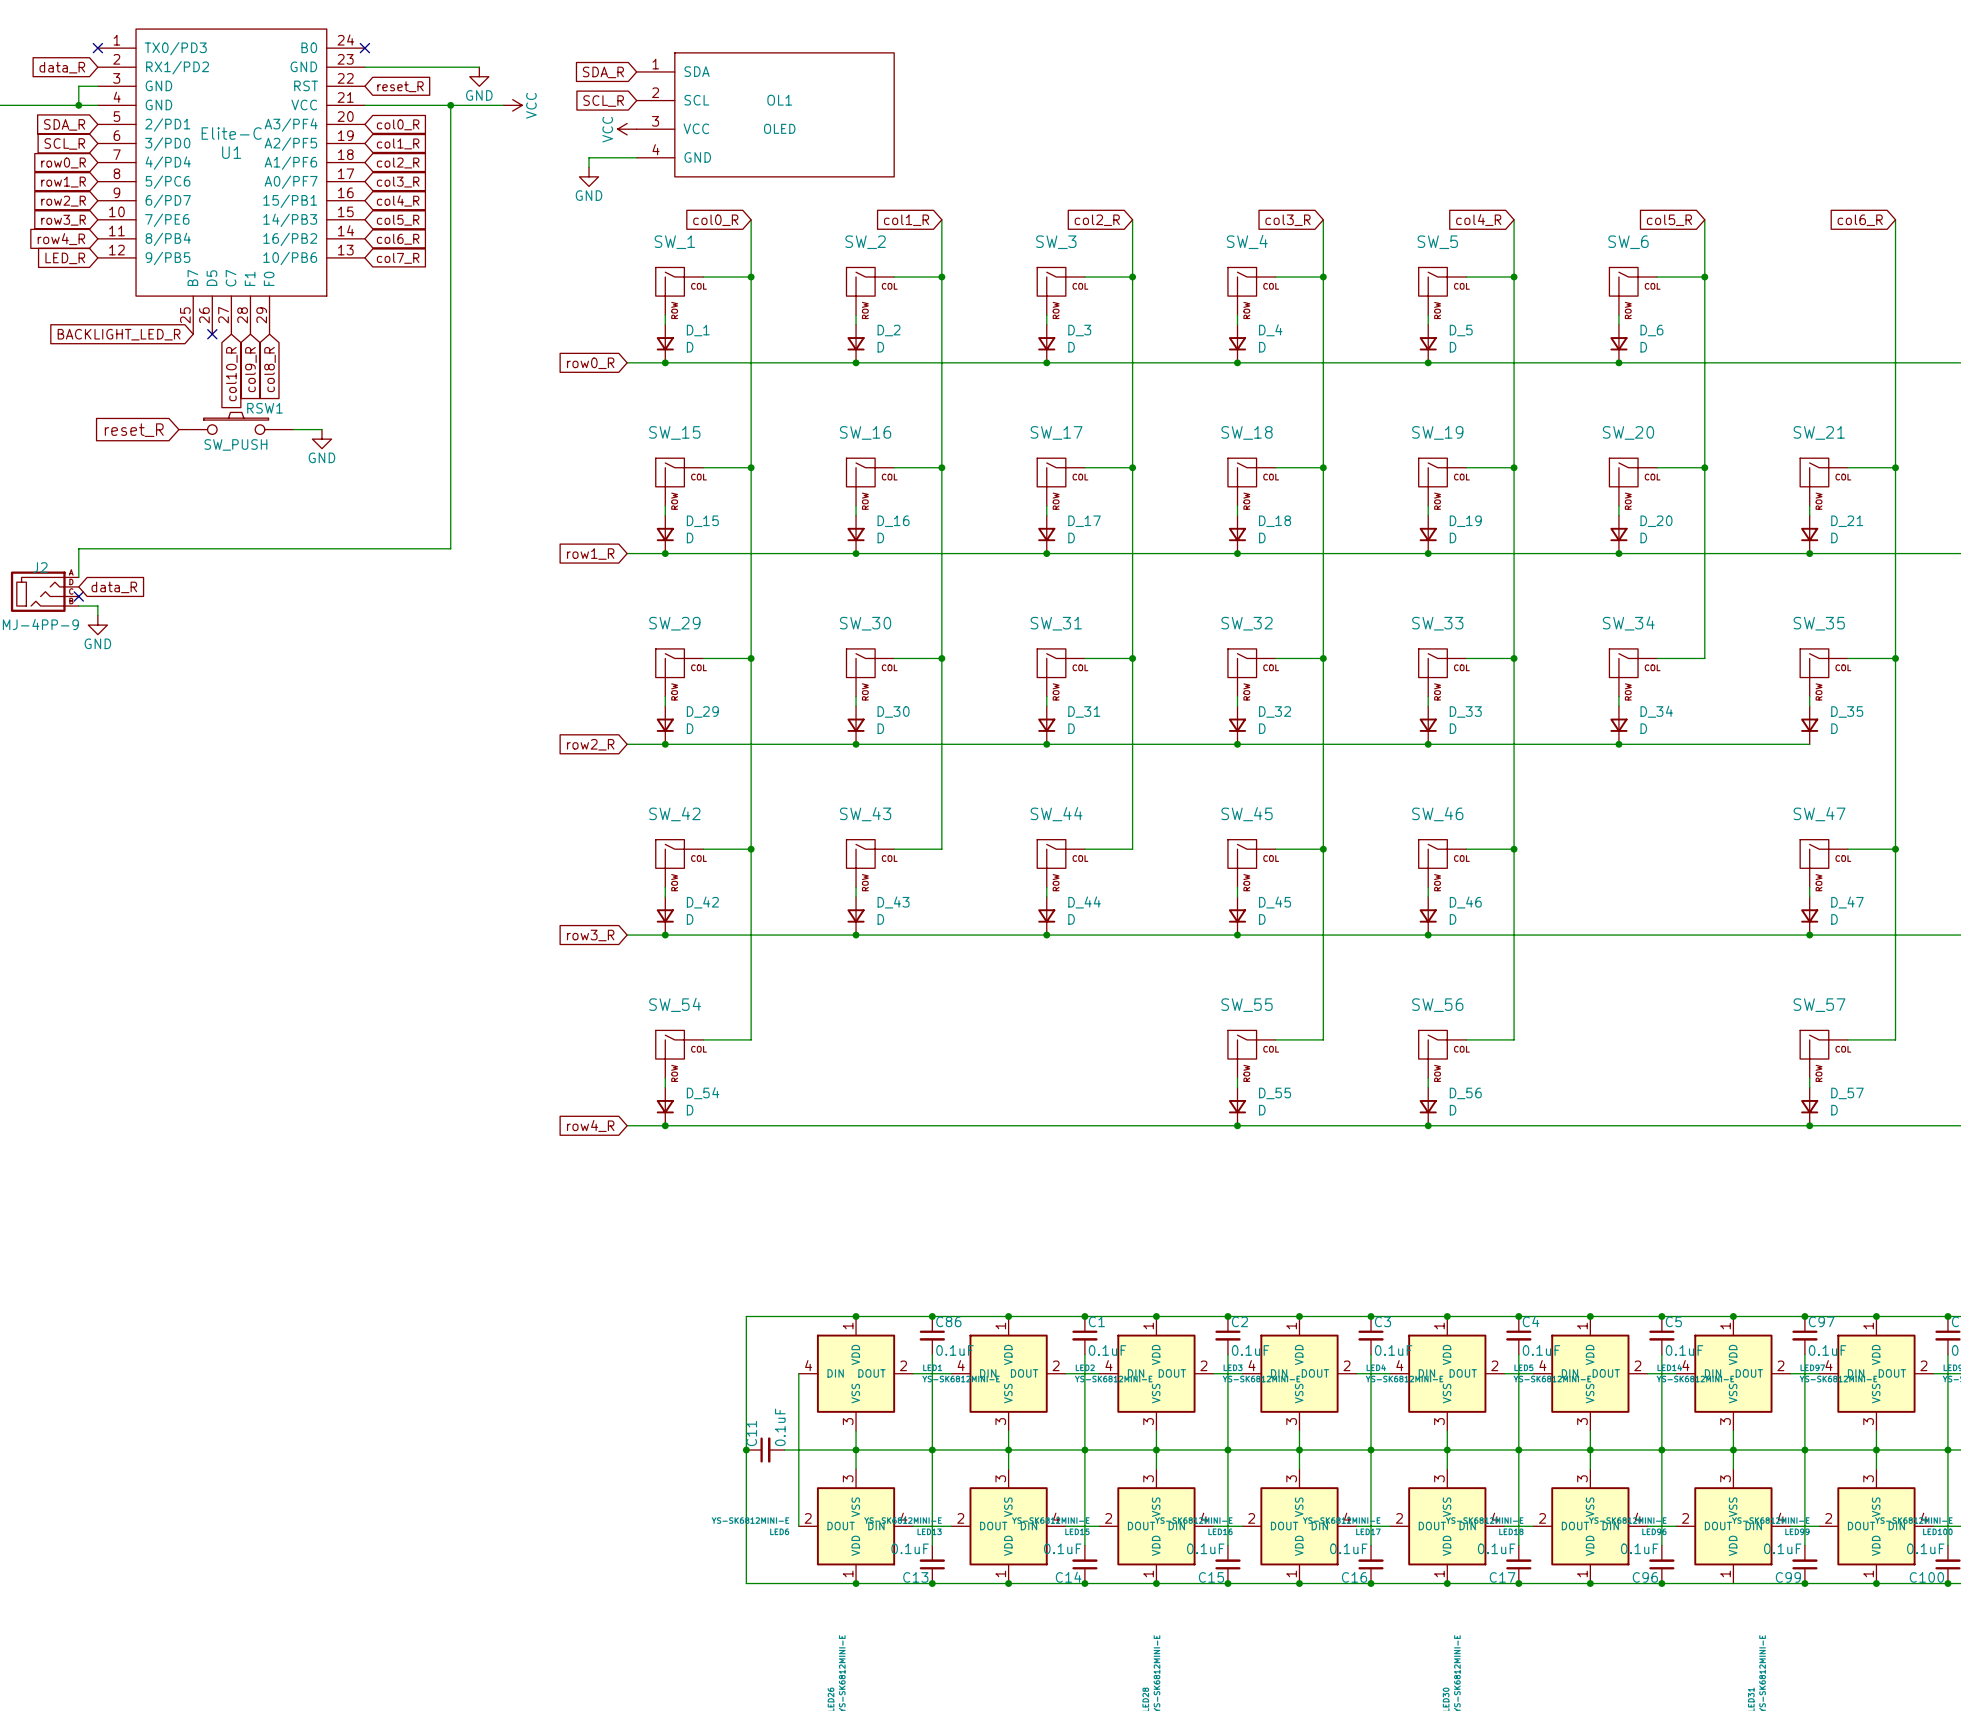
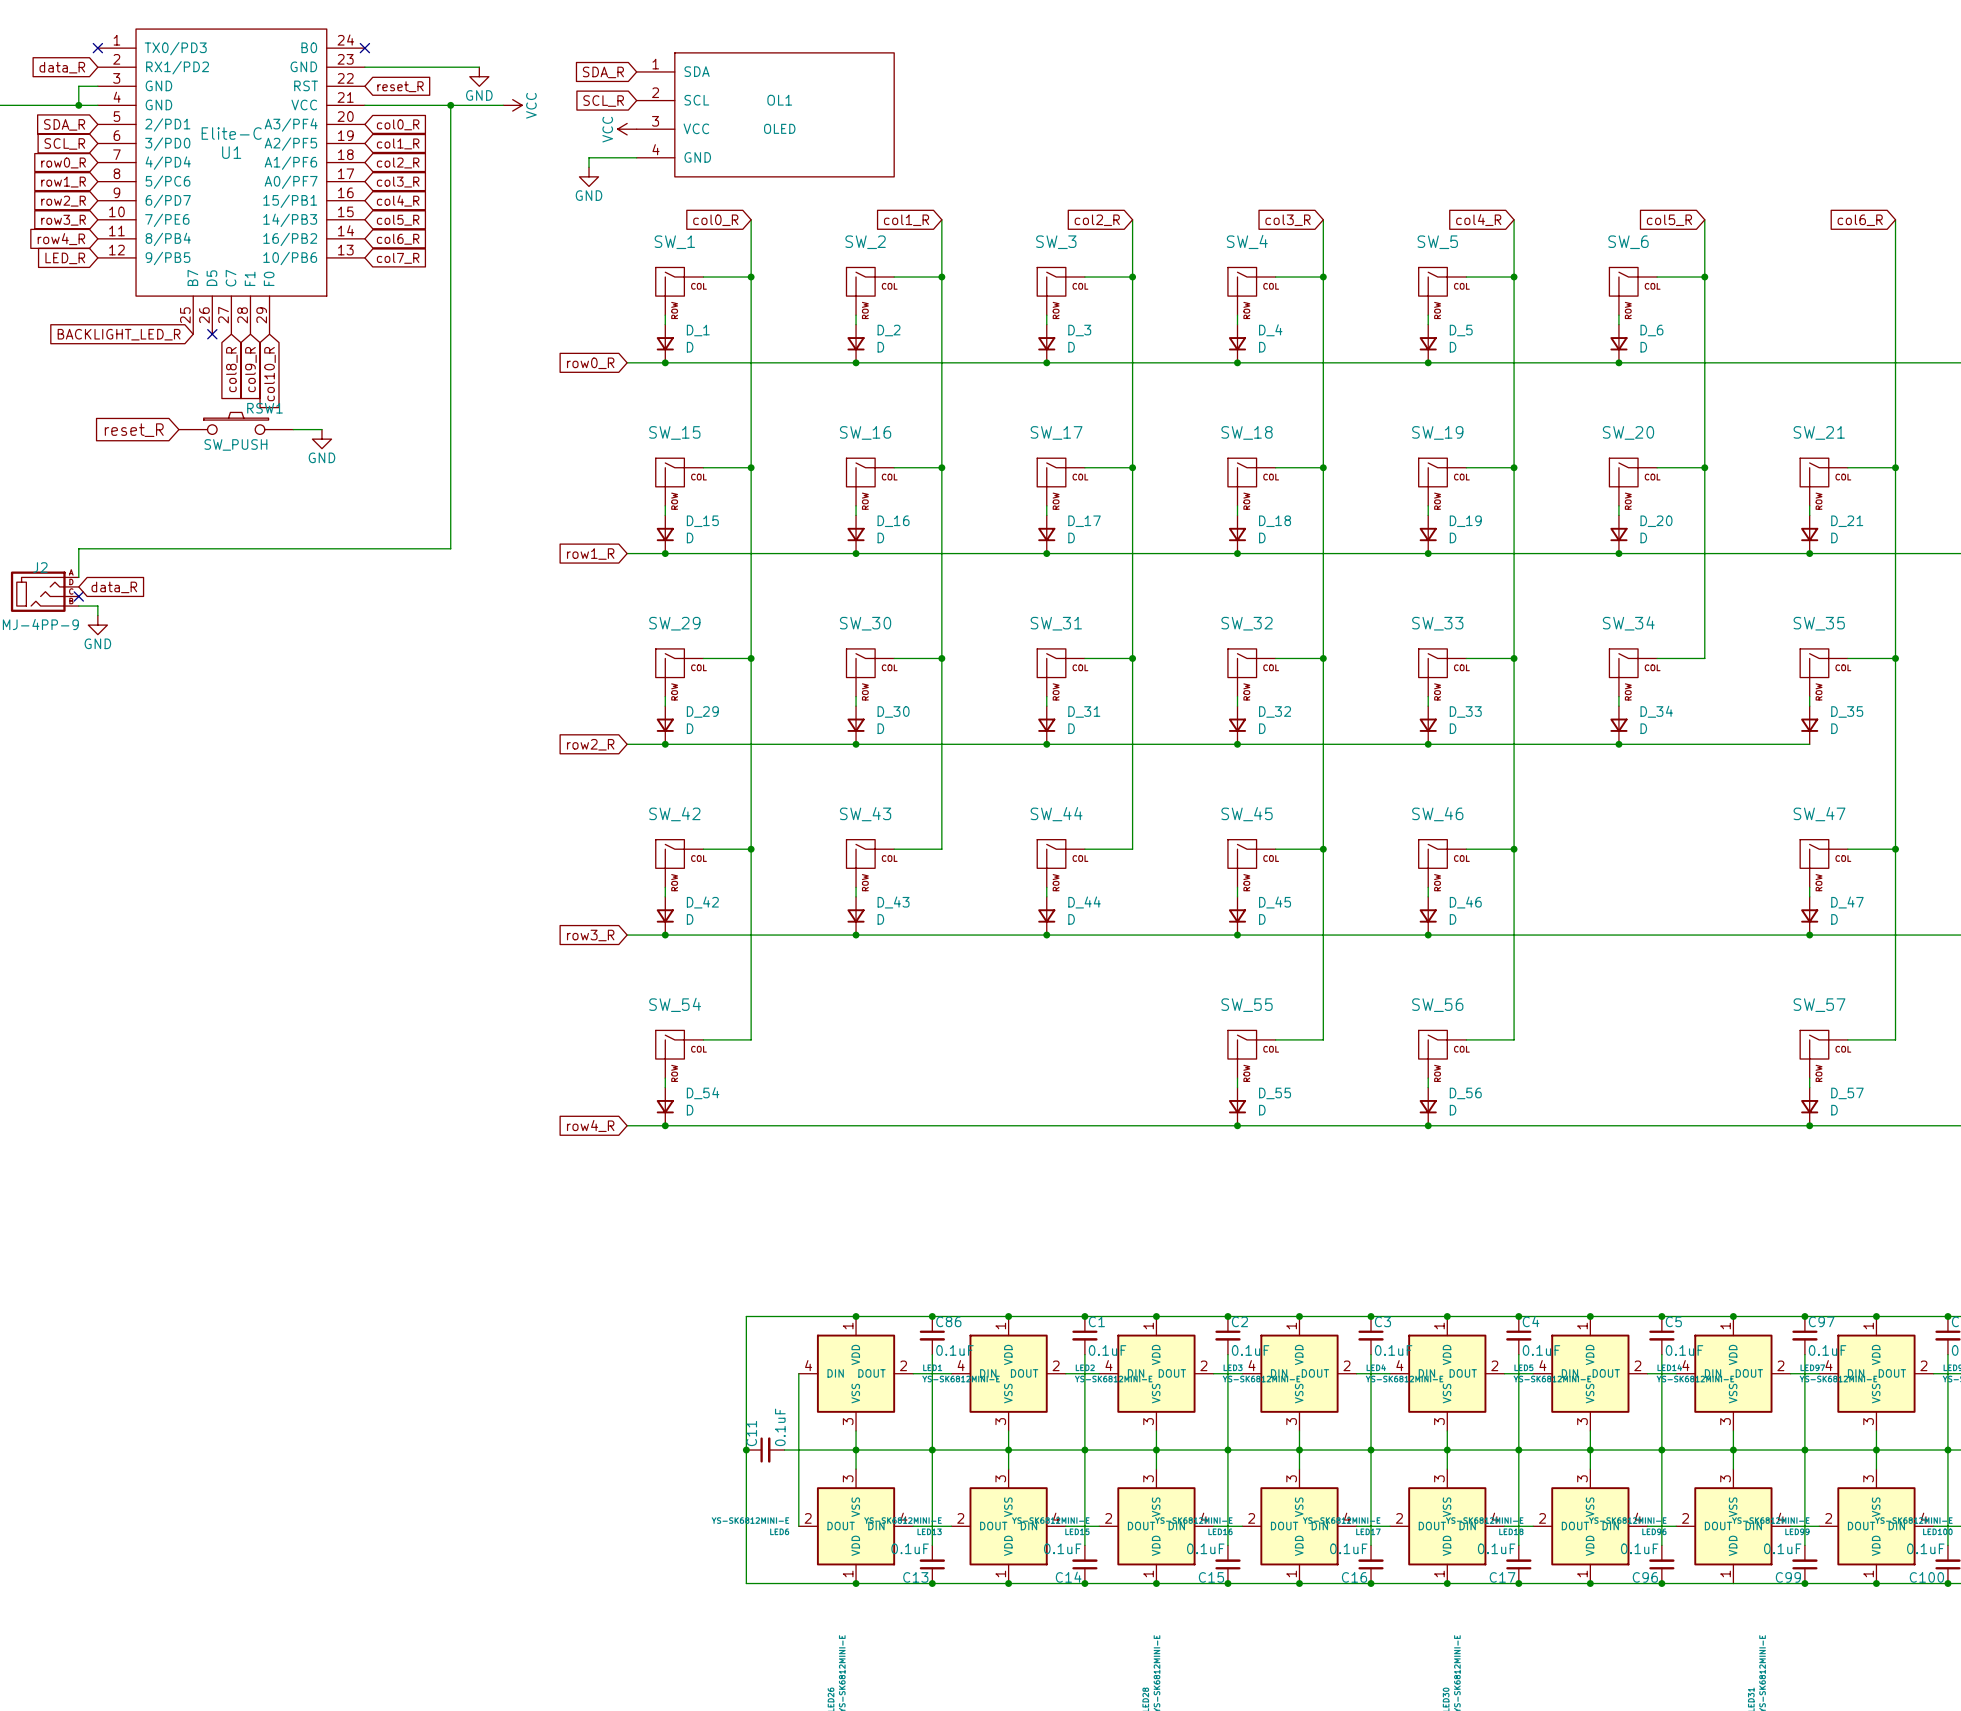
global label: col8_R (269, 369) -> col10_R (269, 374)
global label: col10_R (231, 374) -> col8_R (231, 369)

